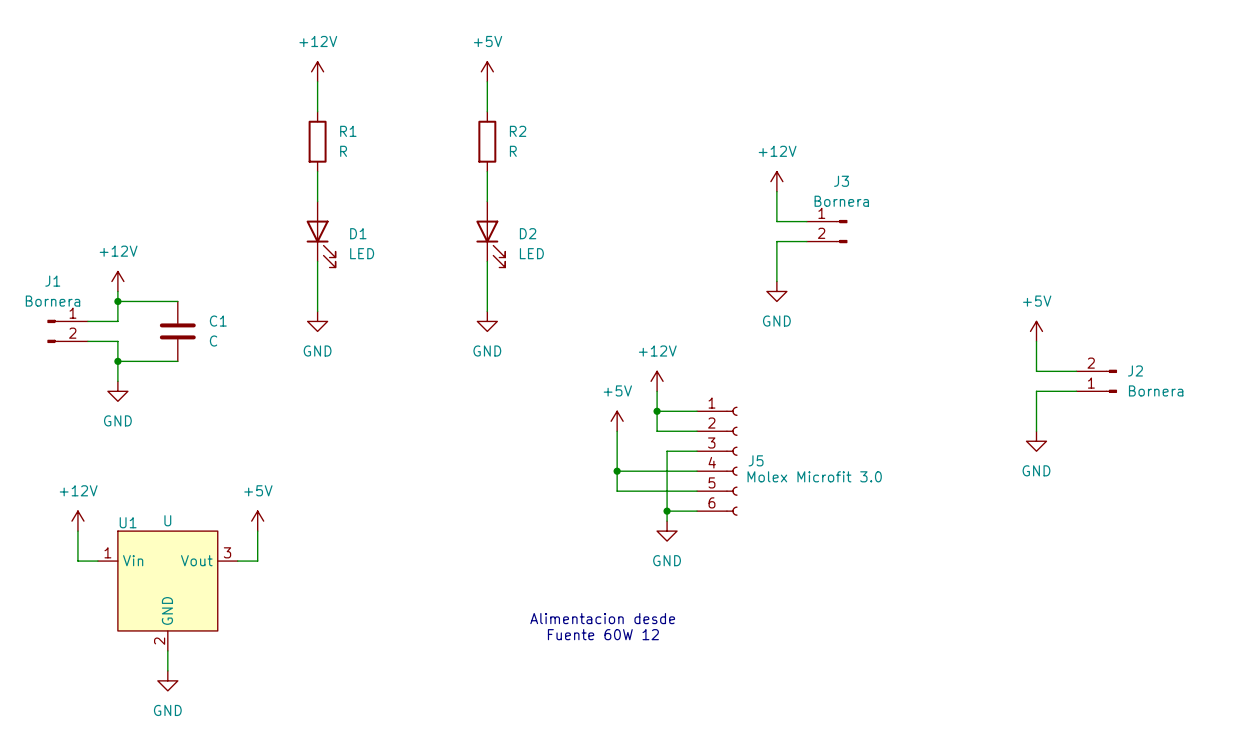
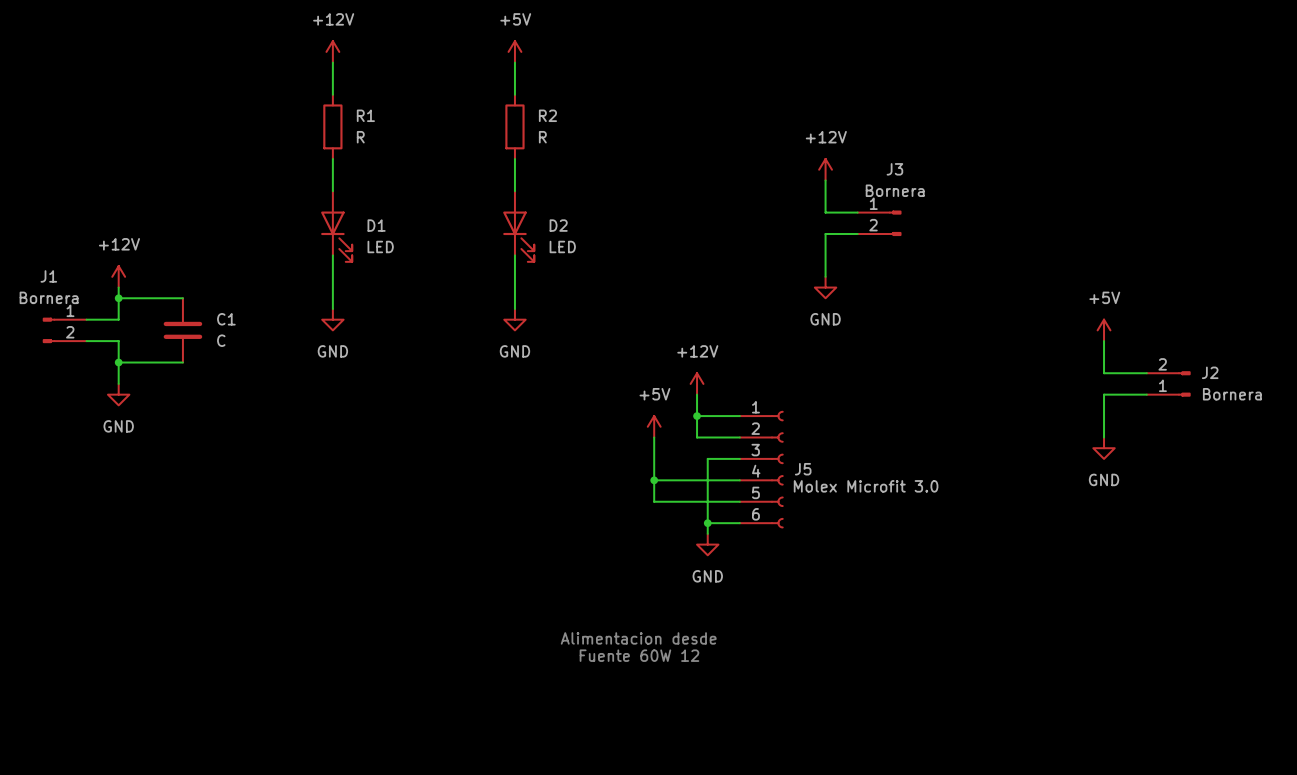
power symbol: +12V (77, 521) -> none
power symbol: +5V (257, 521) -> none
wire: (77, 531) (77, 561) (97, 561) -> none
wire: (257, 531) (257, 561) (237, 561) -> none
U1: U (167, 591) -> none
wire: (167, 650) (167, 670) -> none
power symbol: GND (167, 680) -> none

